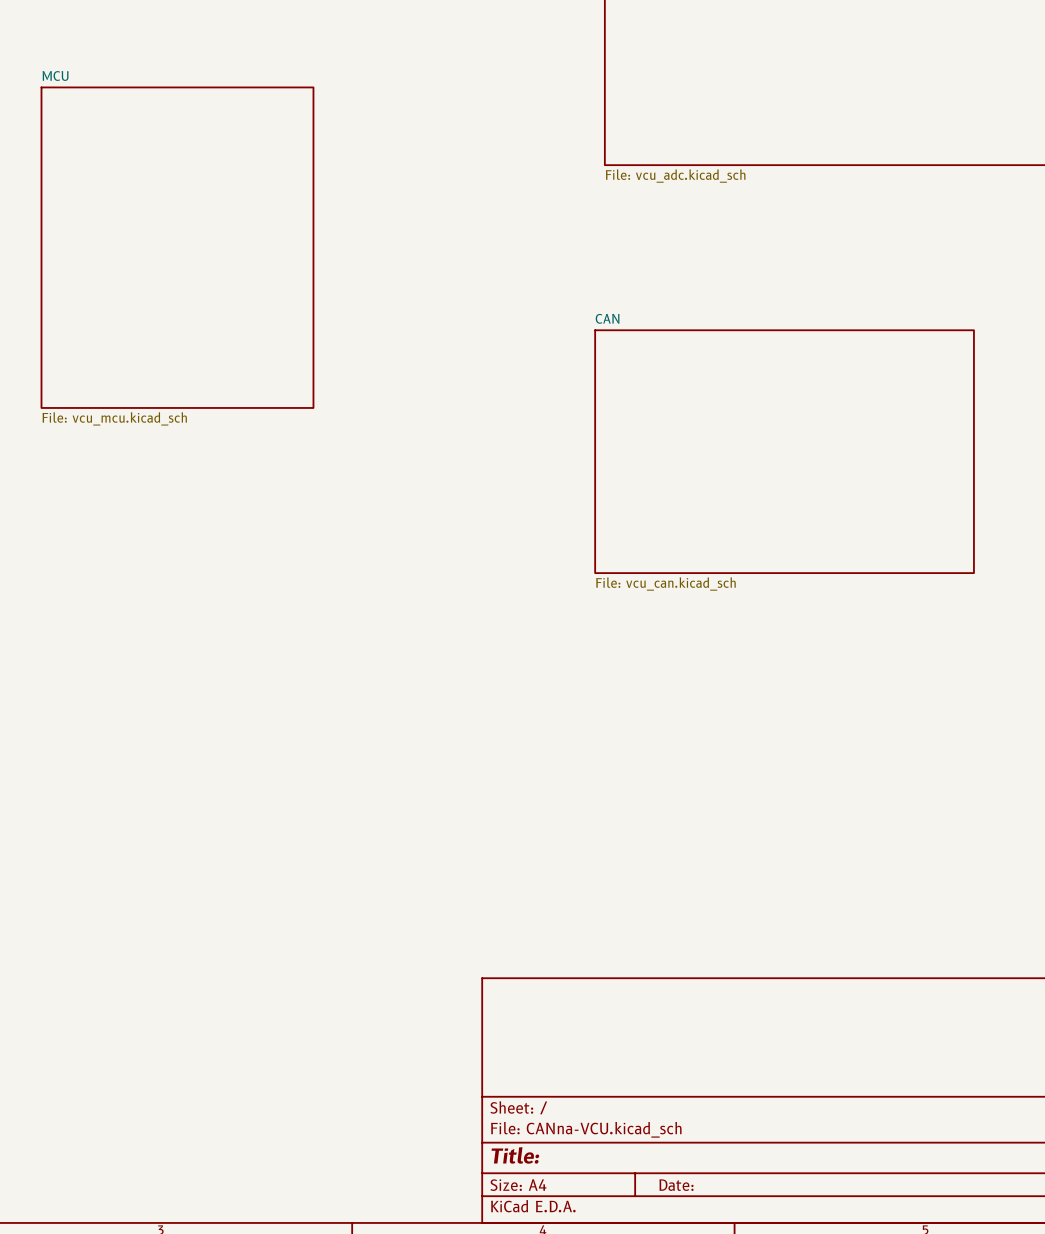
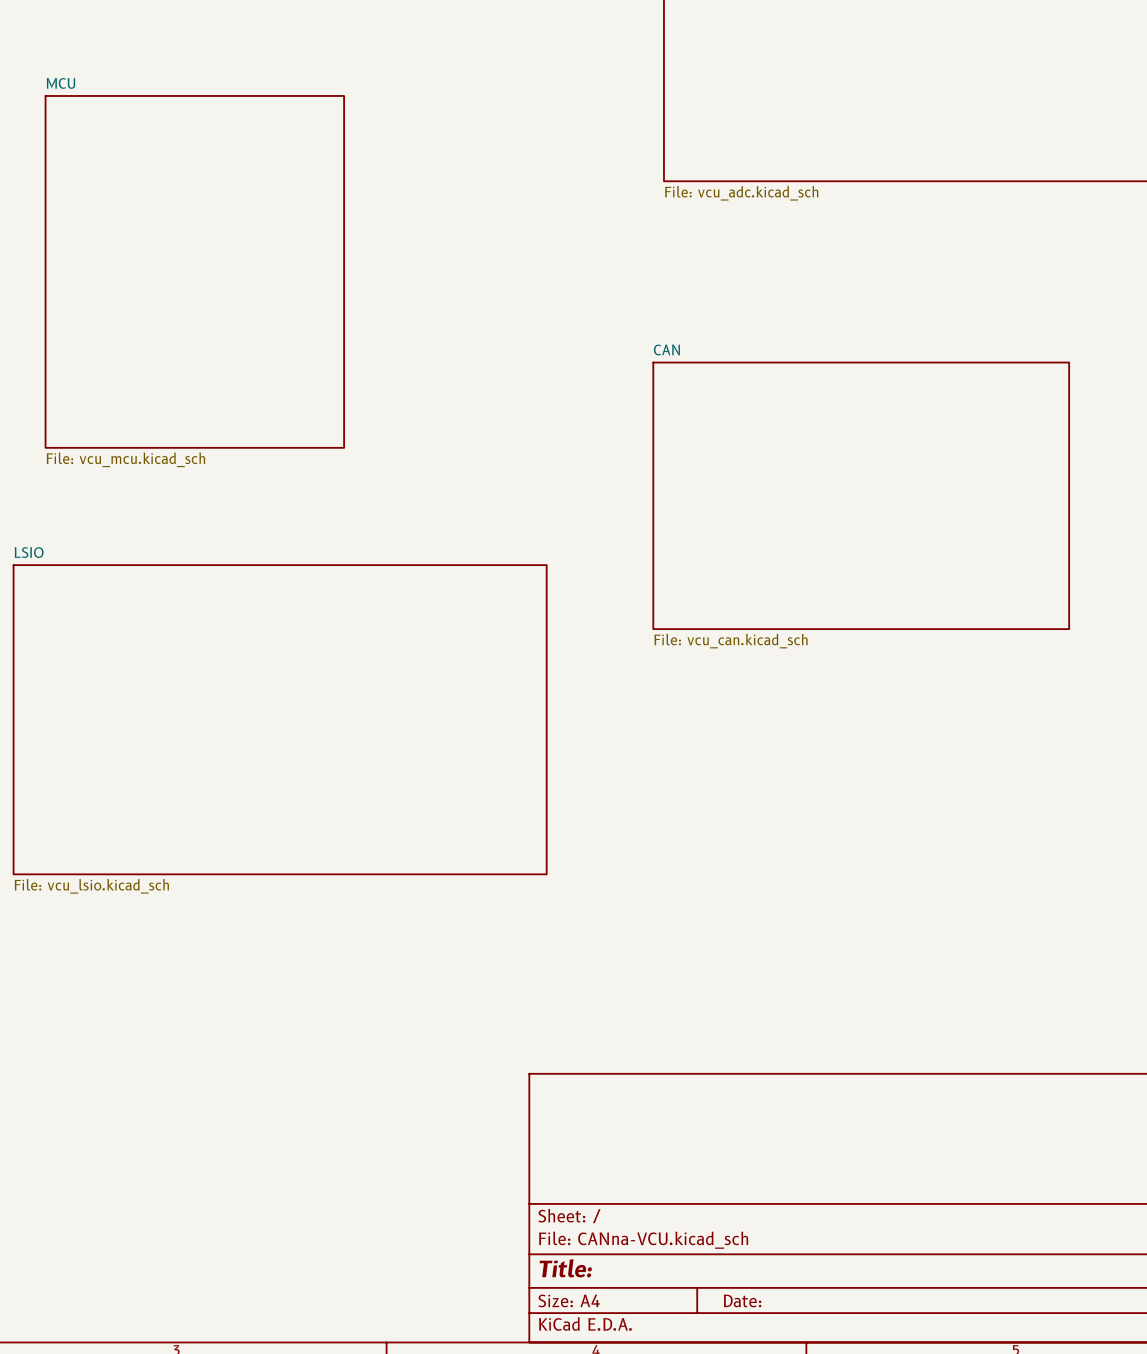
sheet LSIO: none -> File: vcu_lsio.kicad_sch (280, 719)

